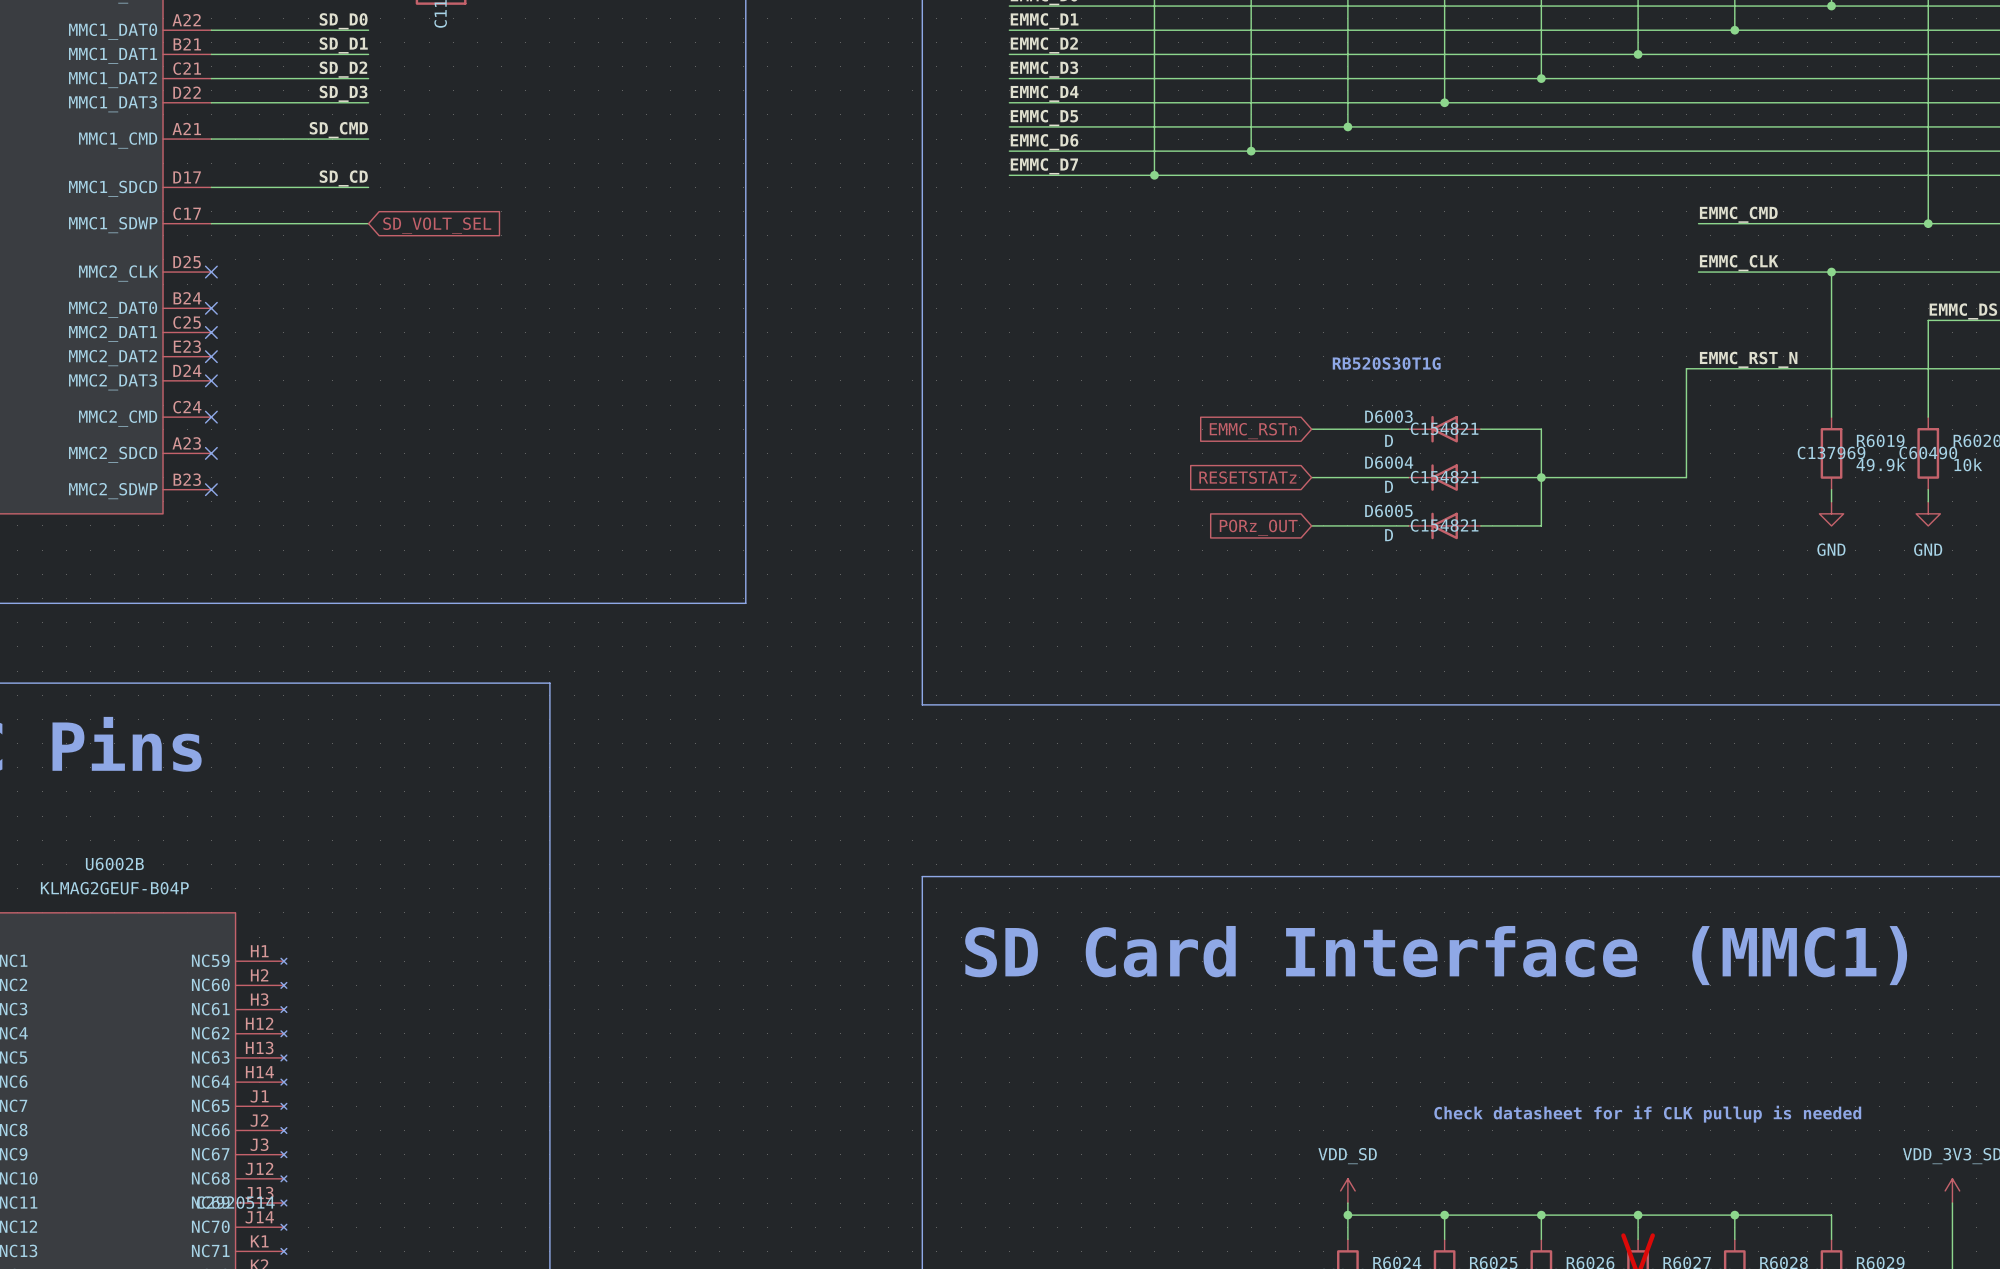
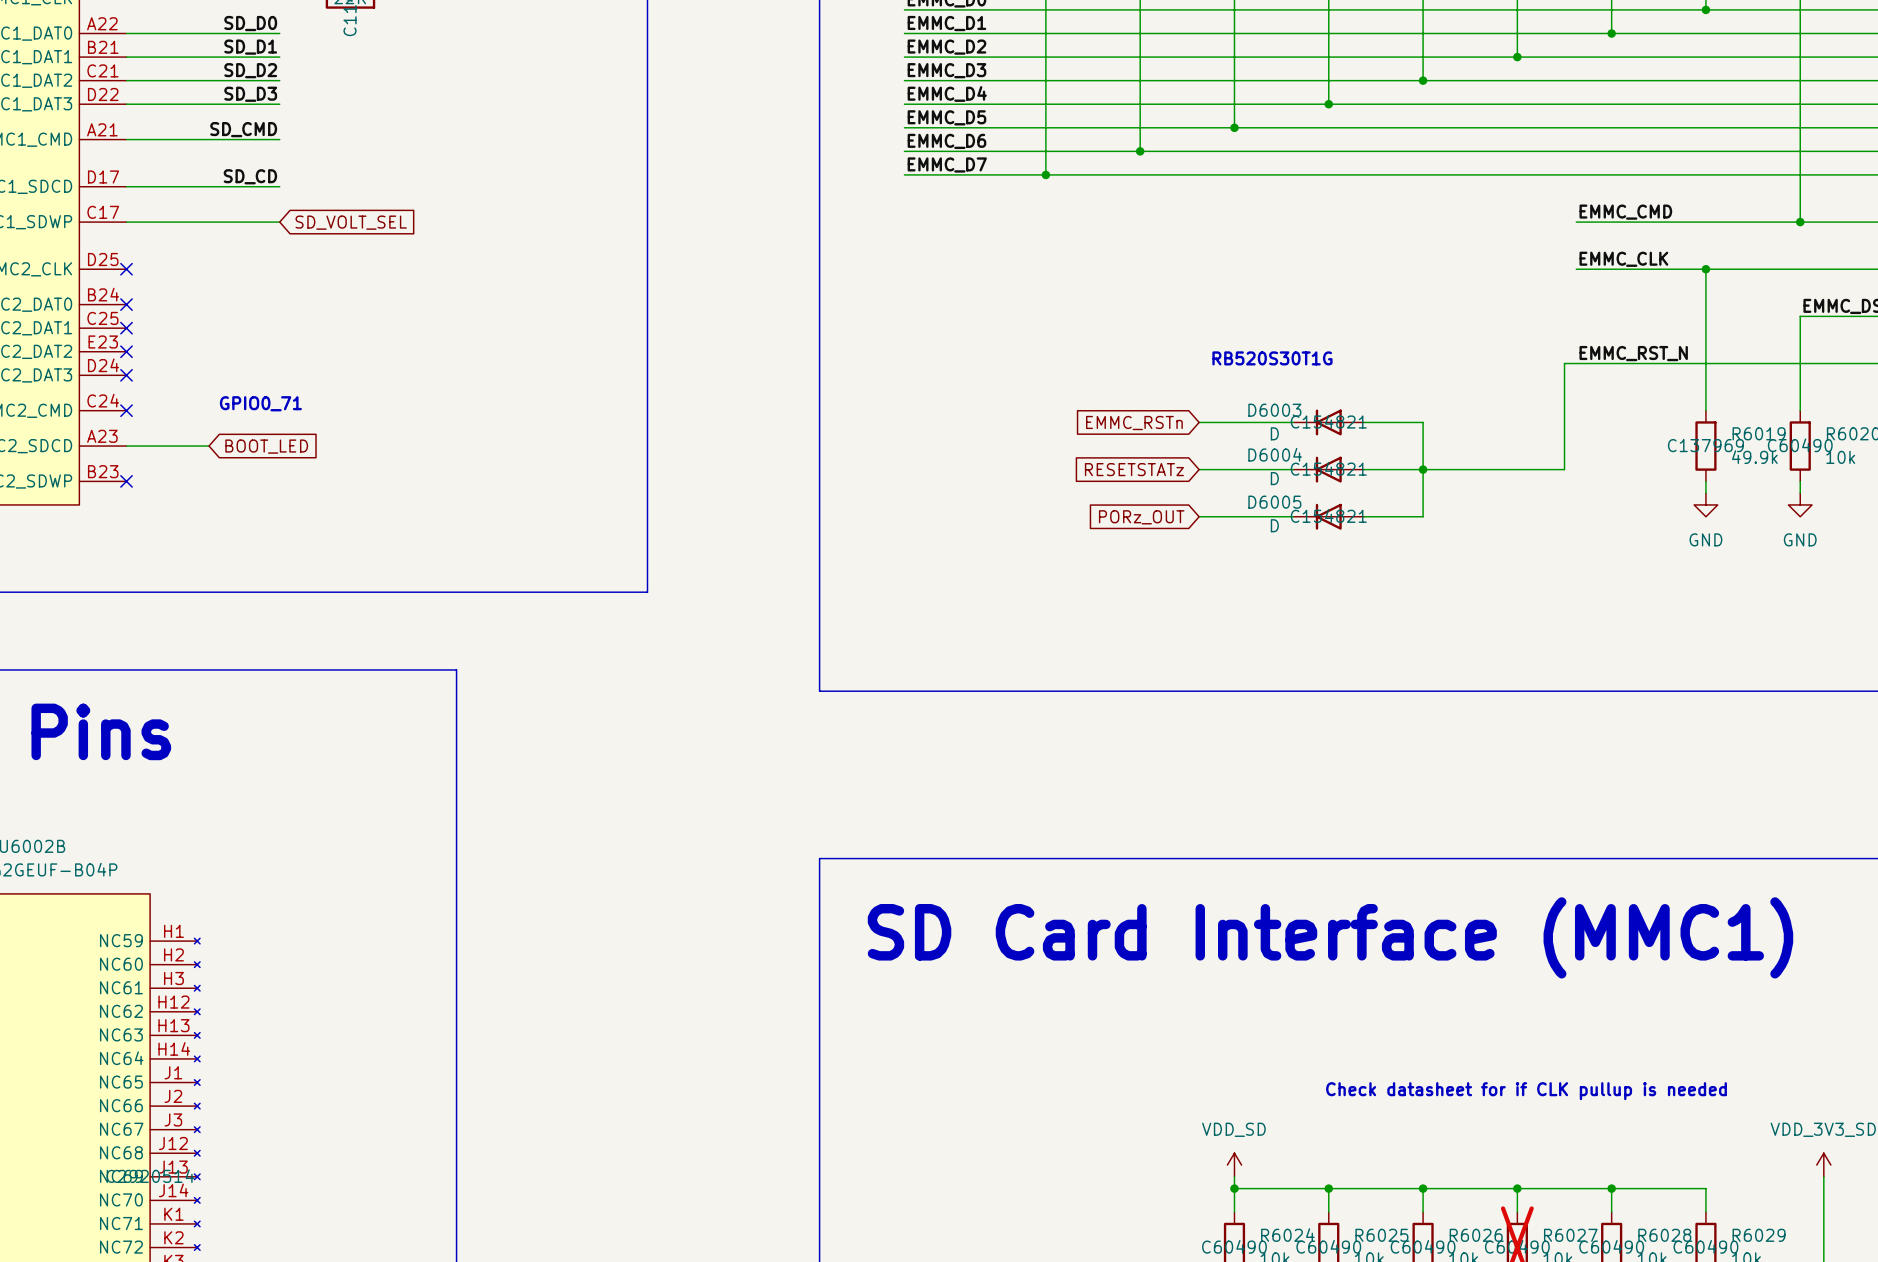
text: none -> GPIO0_71 (260, 403)
wire: none -> (126, 446) (209, 446)
no-connect mark: (211, 453) -> none
global label: none -> BOOT_LED (266, 446)

